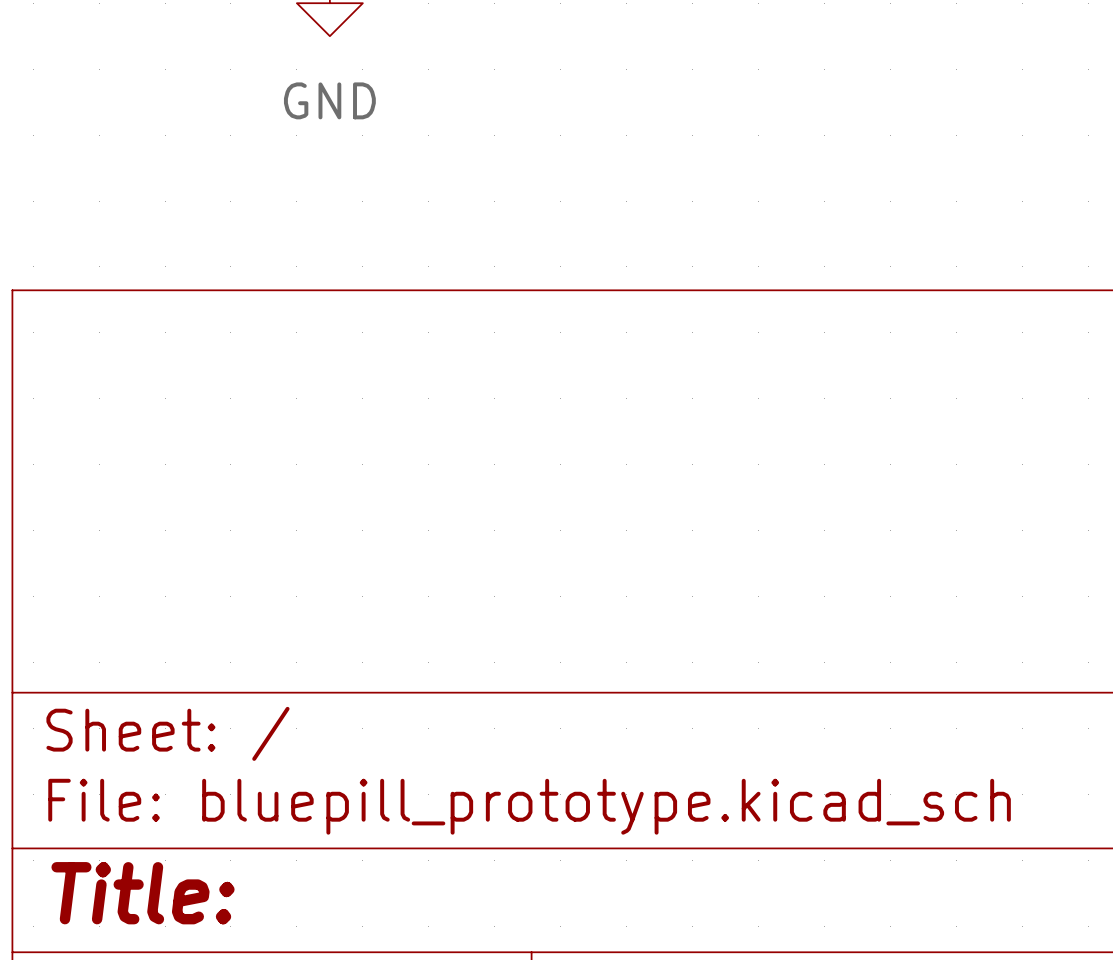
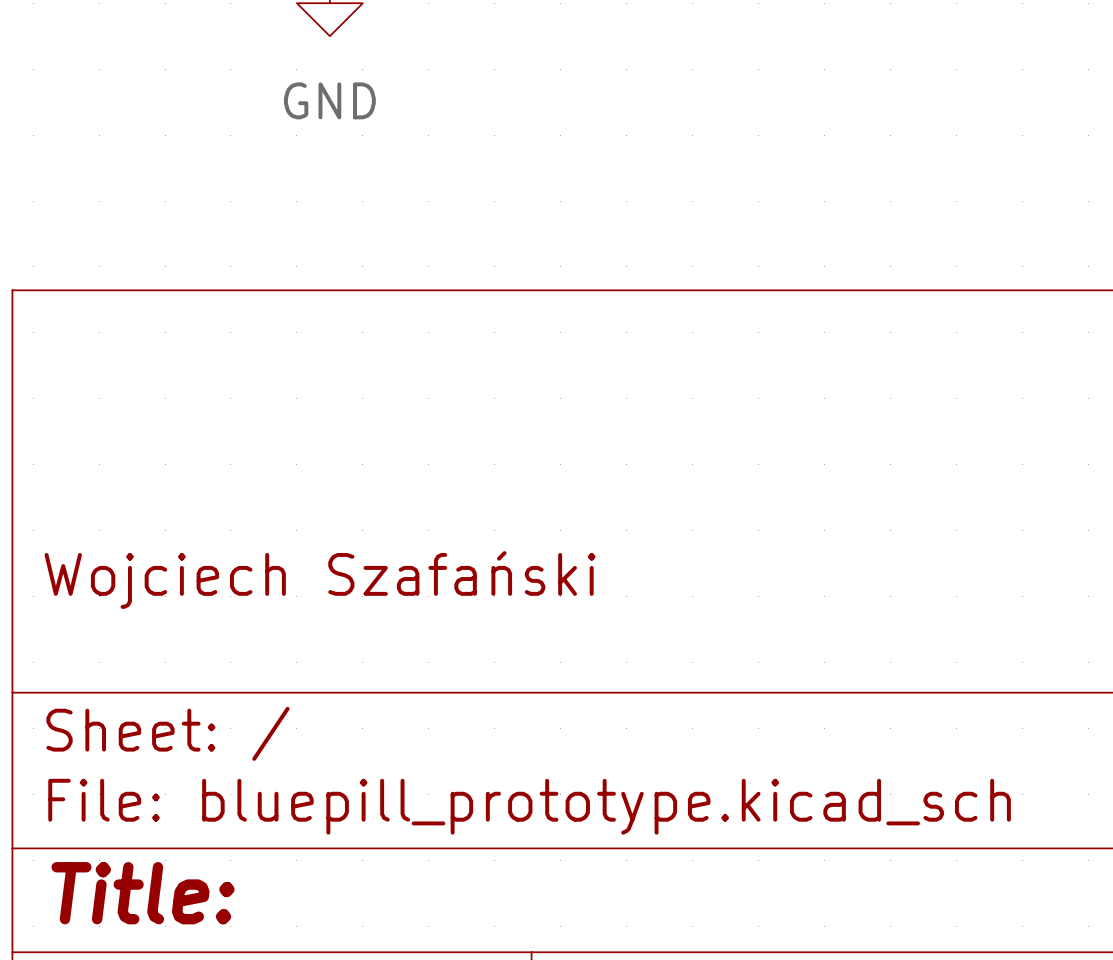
title block: none -> Wojciech Szafański (320, 579)

